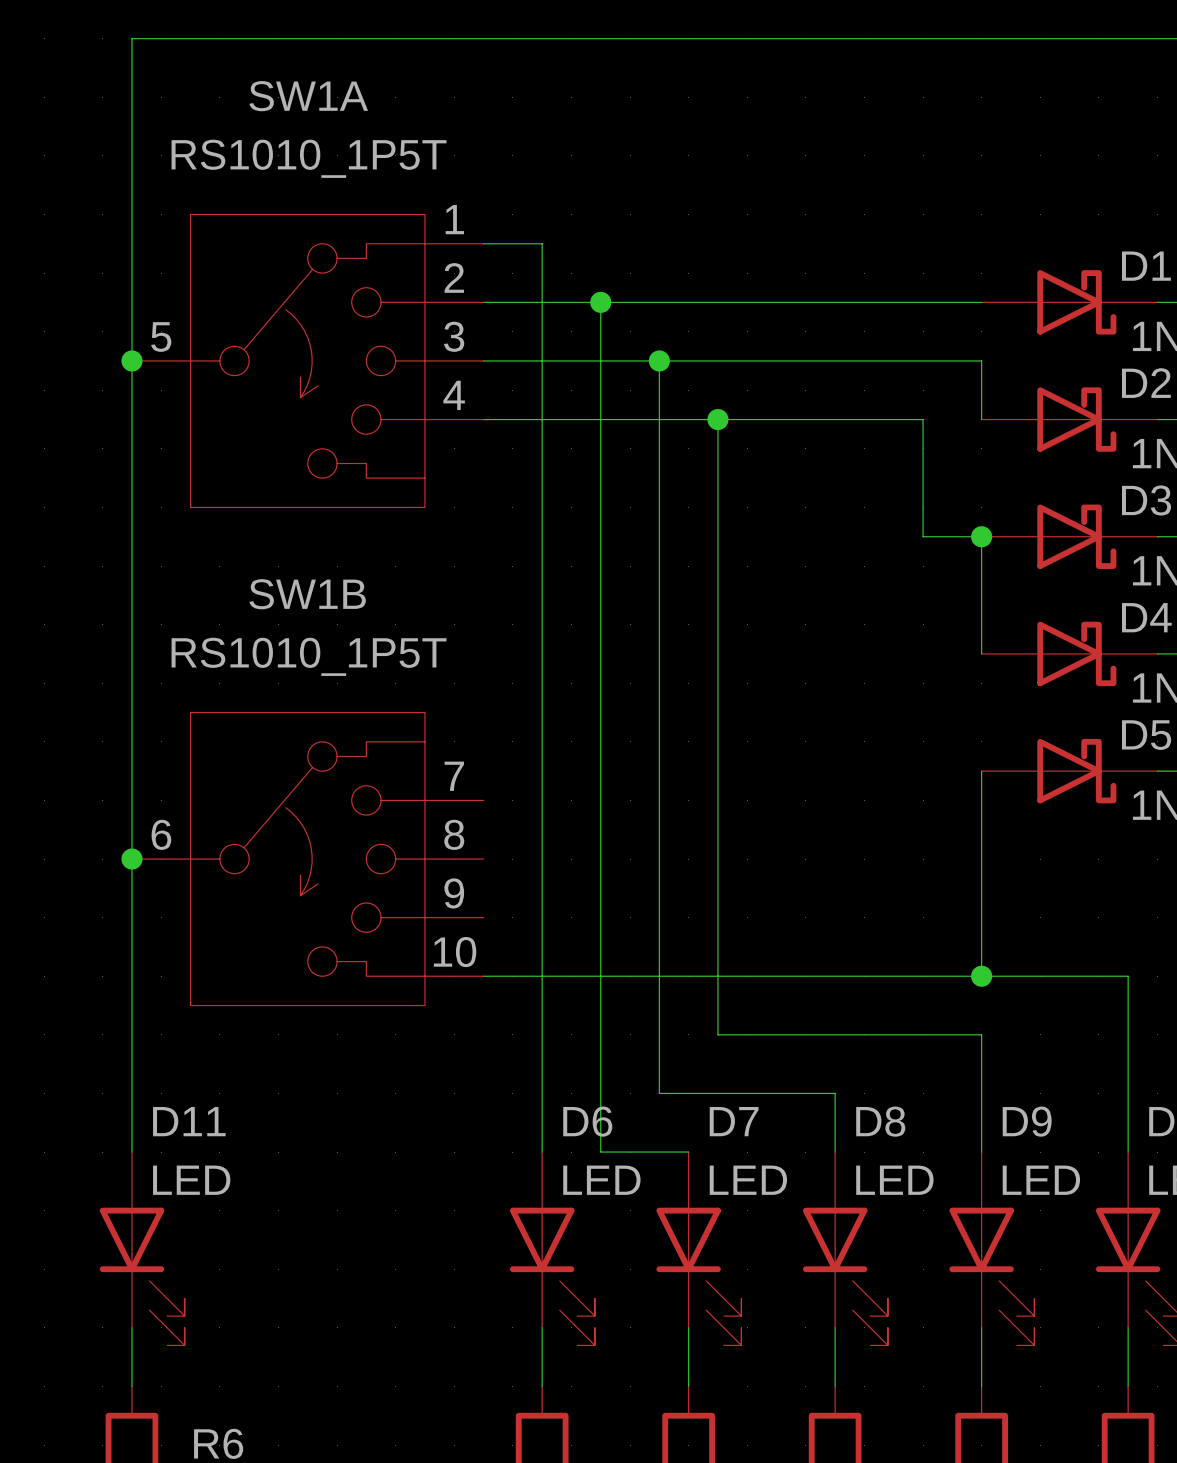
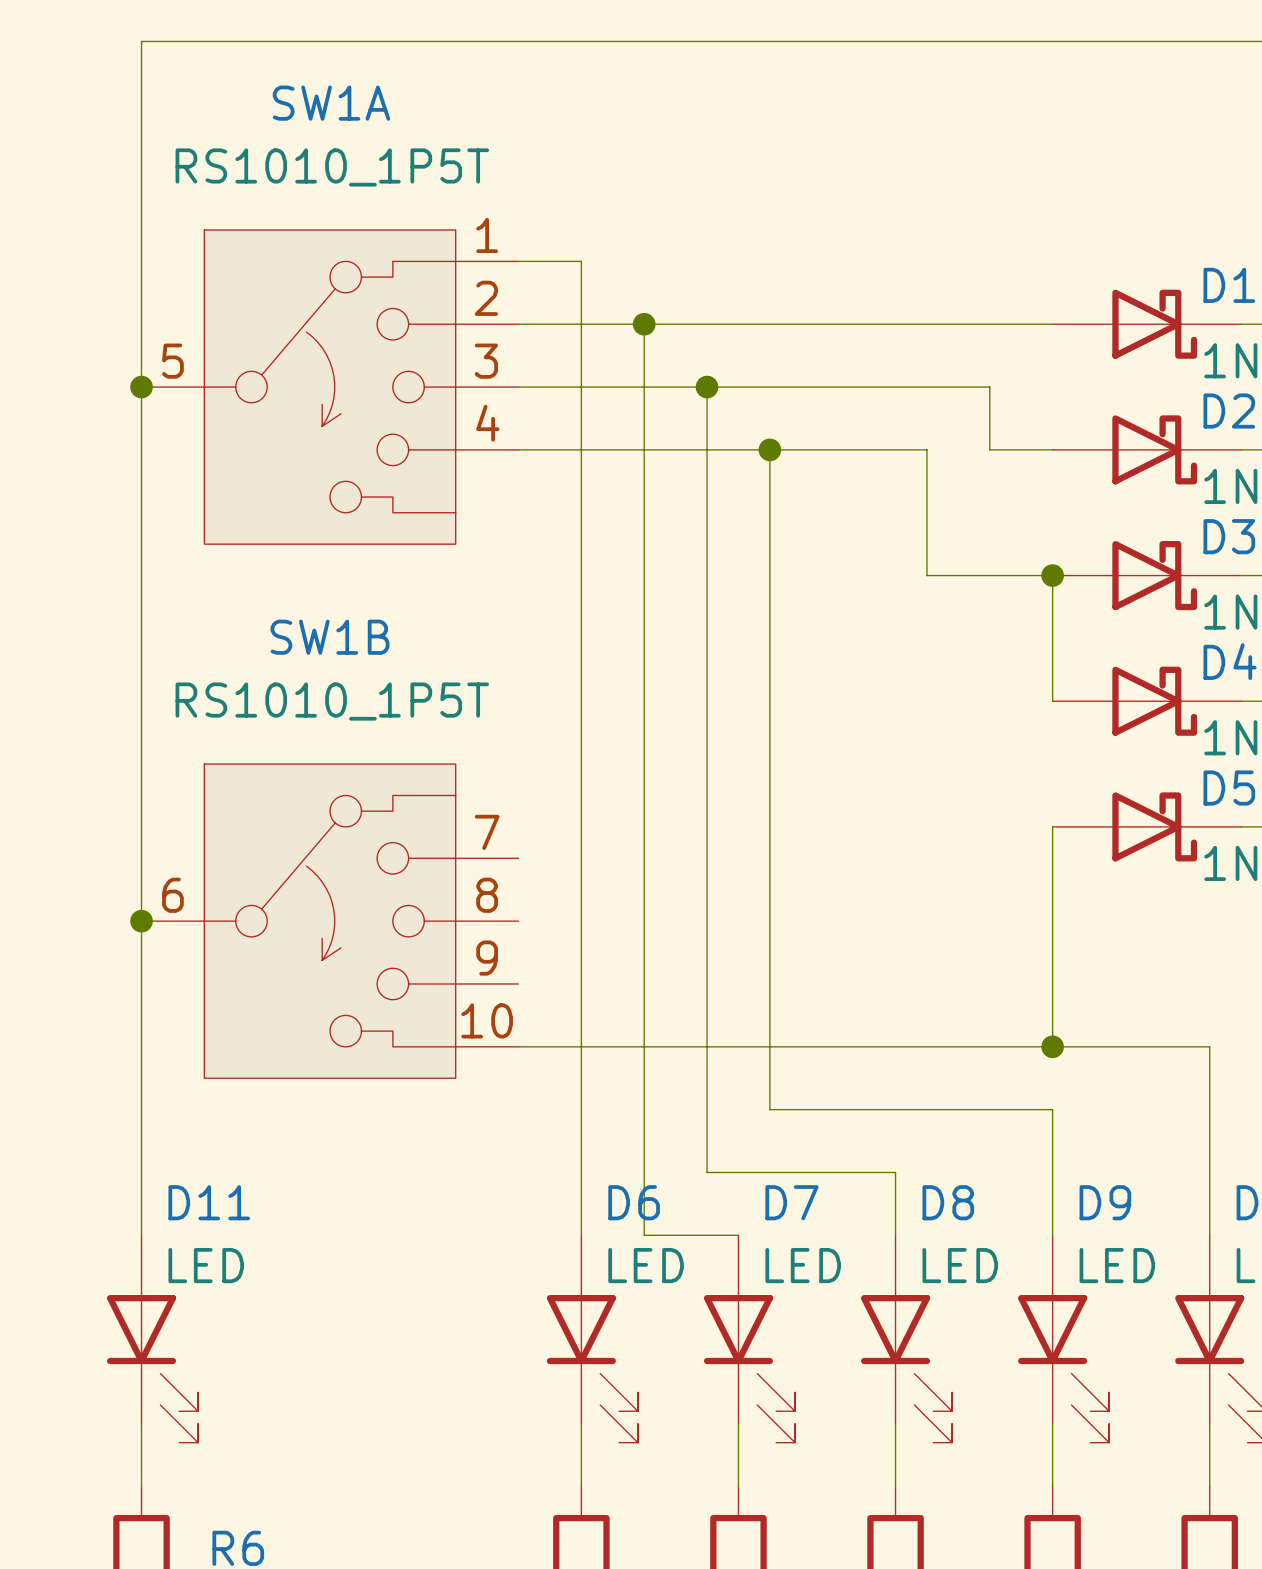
wire: (923, 360) (981, 360) (981, 419) -> (989, 387) (989, 449) (1052, 449)
wire: (864, 419) (923, 419) (923, 536) -> (926, 449) (926, 575) (989, 575)

